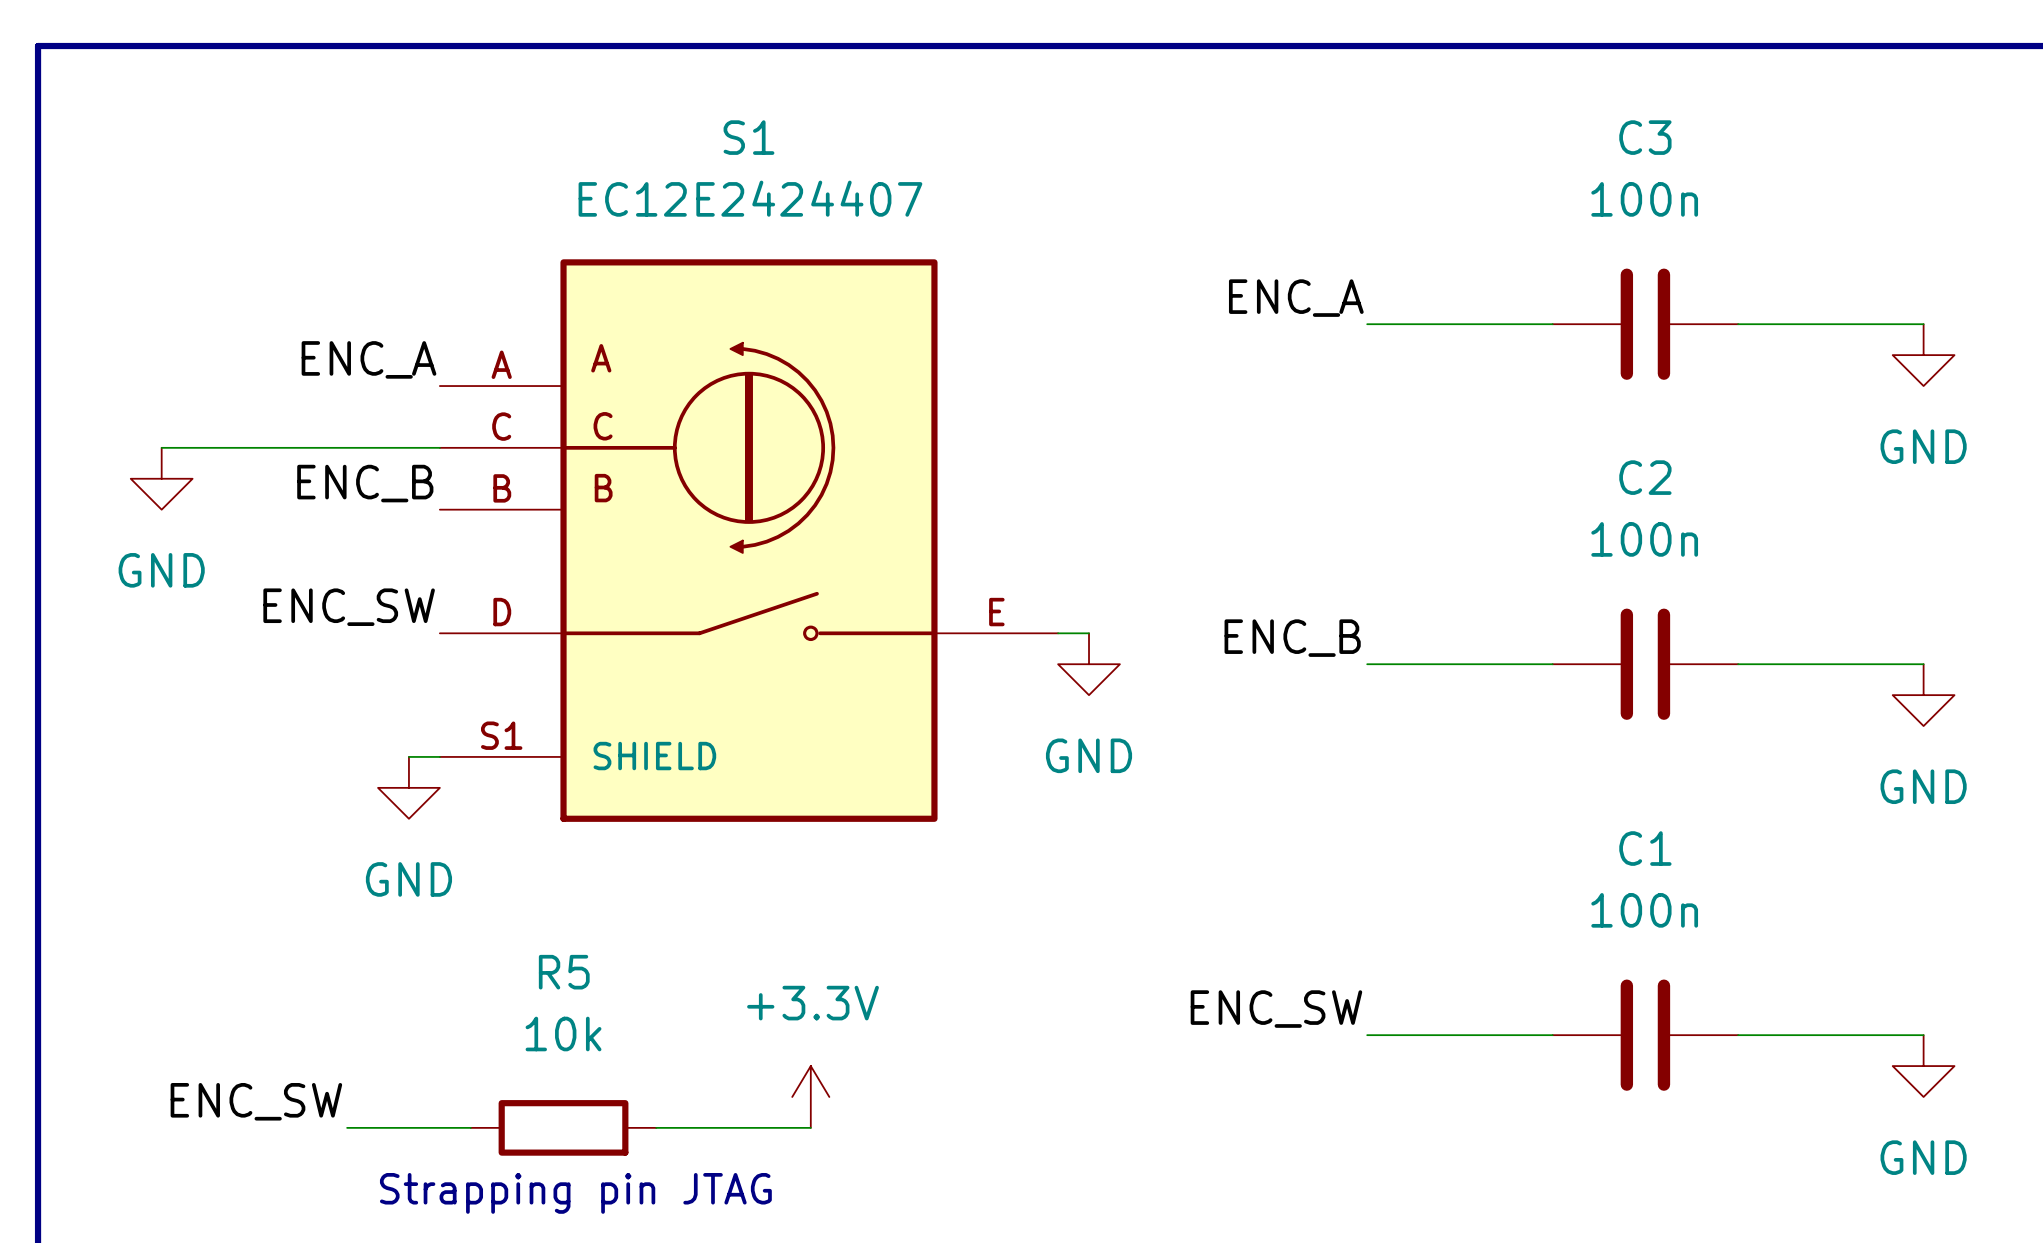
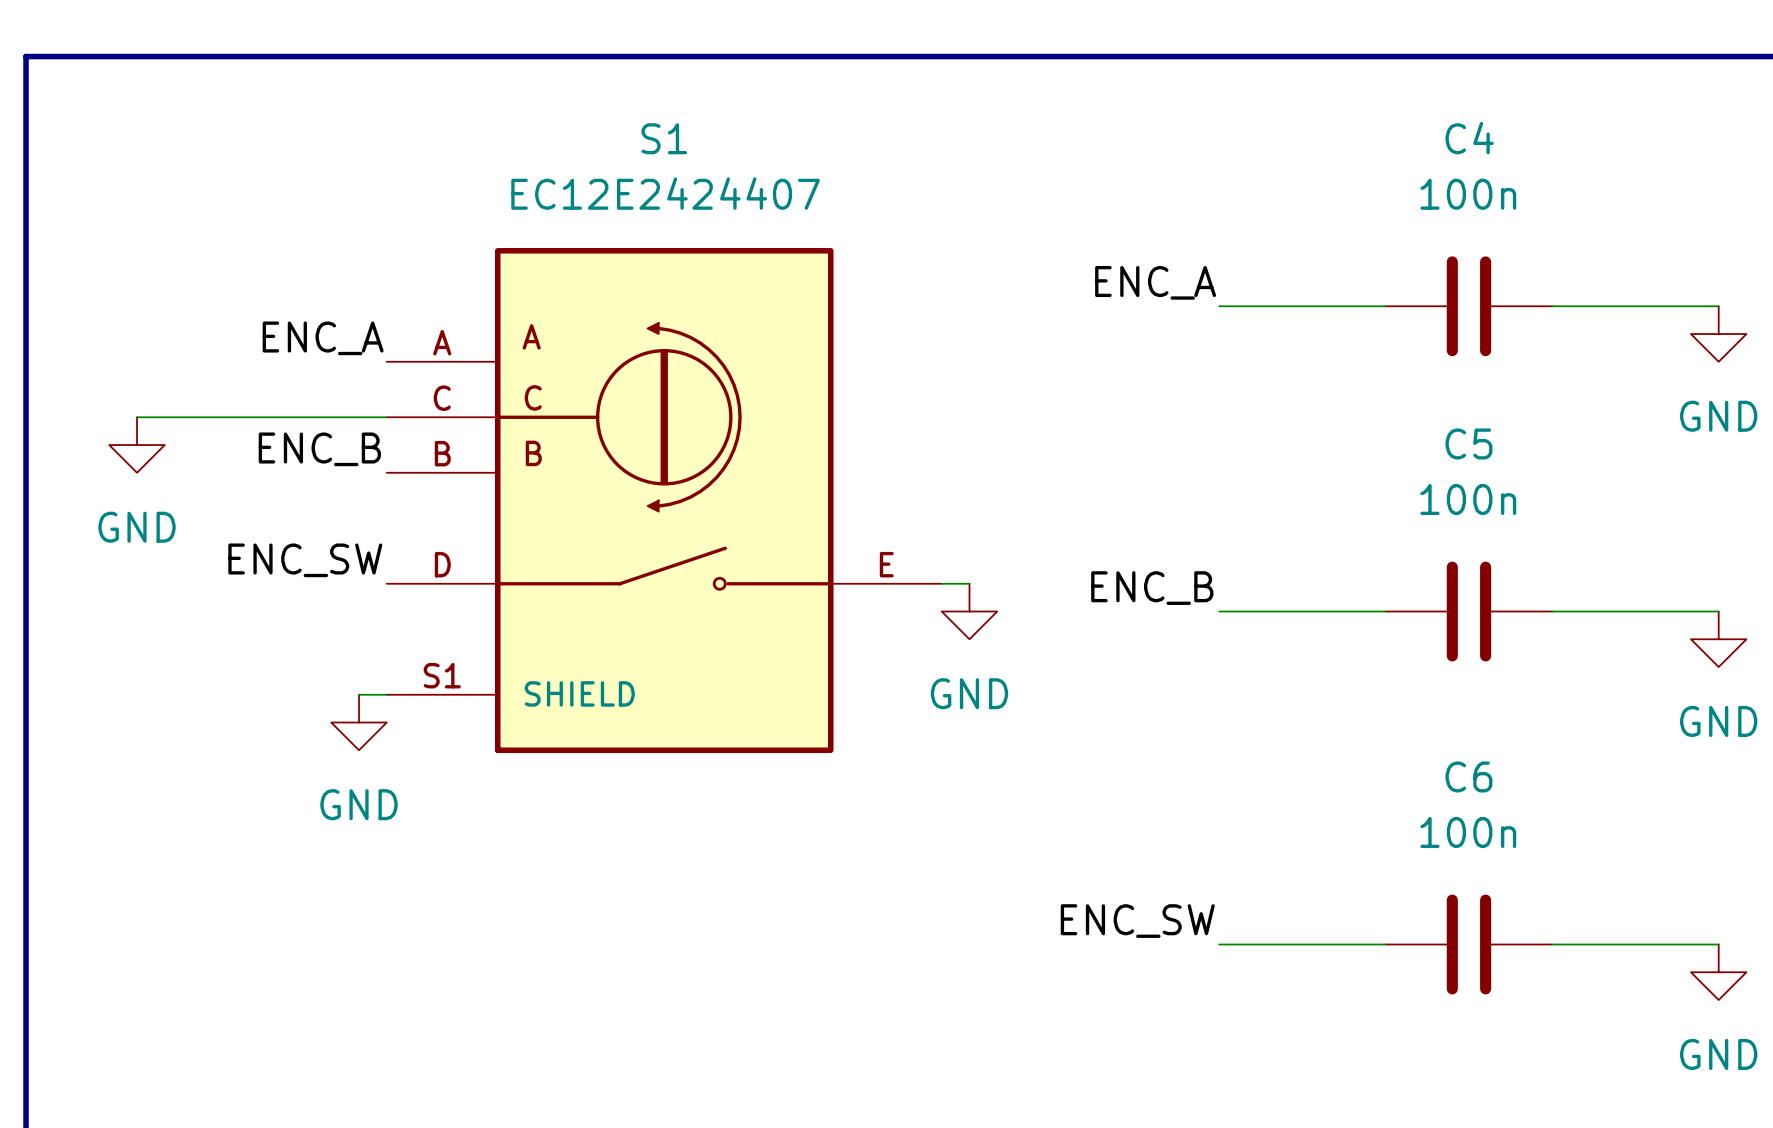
C3 name: C3 (1645, 137) -> C4 (1469, 138)
C2 name: C2 (1645, 477) -> C5 (1468, 443)
C1 name: C1 (1645, 848) -> C6 (1468, 776)
power symbol: +3.3V (810, 1096) -> none
label: ENC_SW (256, 1101) -> none
wire: (347, 1127) (470, 1127) -> none
R5: 10k (563, 1127) -> none
wire: (656, 1127) (810, 1127) -> none
text: Strapping pin JTAG (575, 1193) -> none

